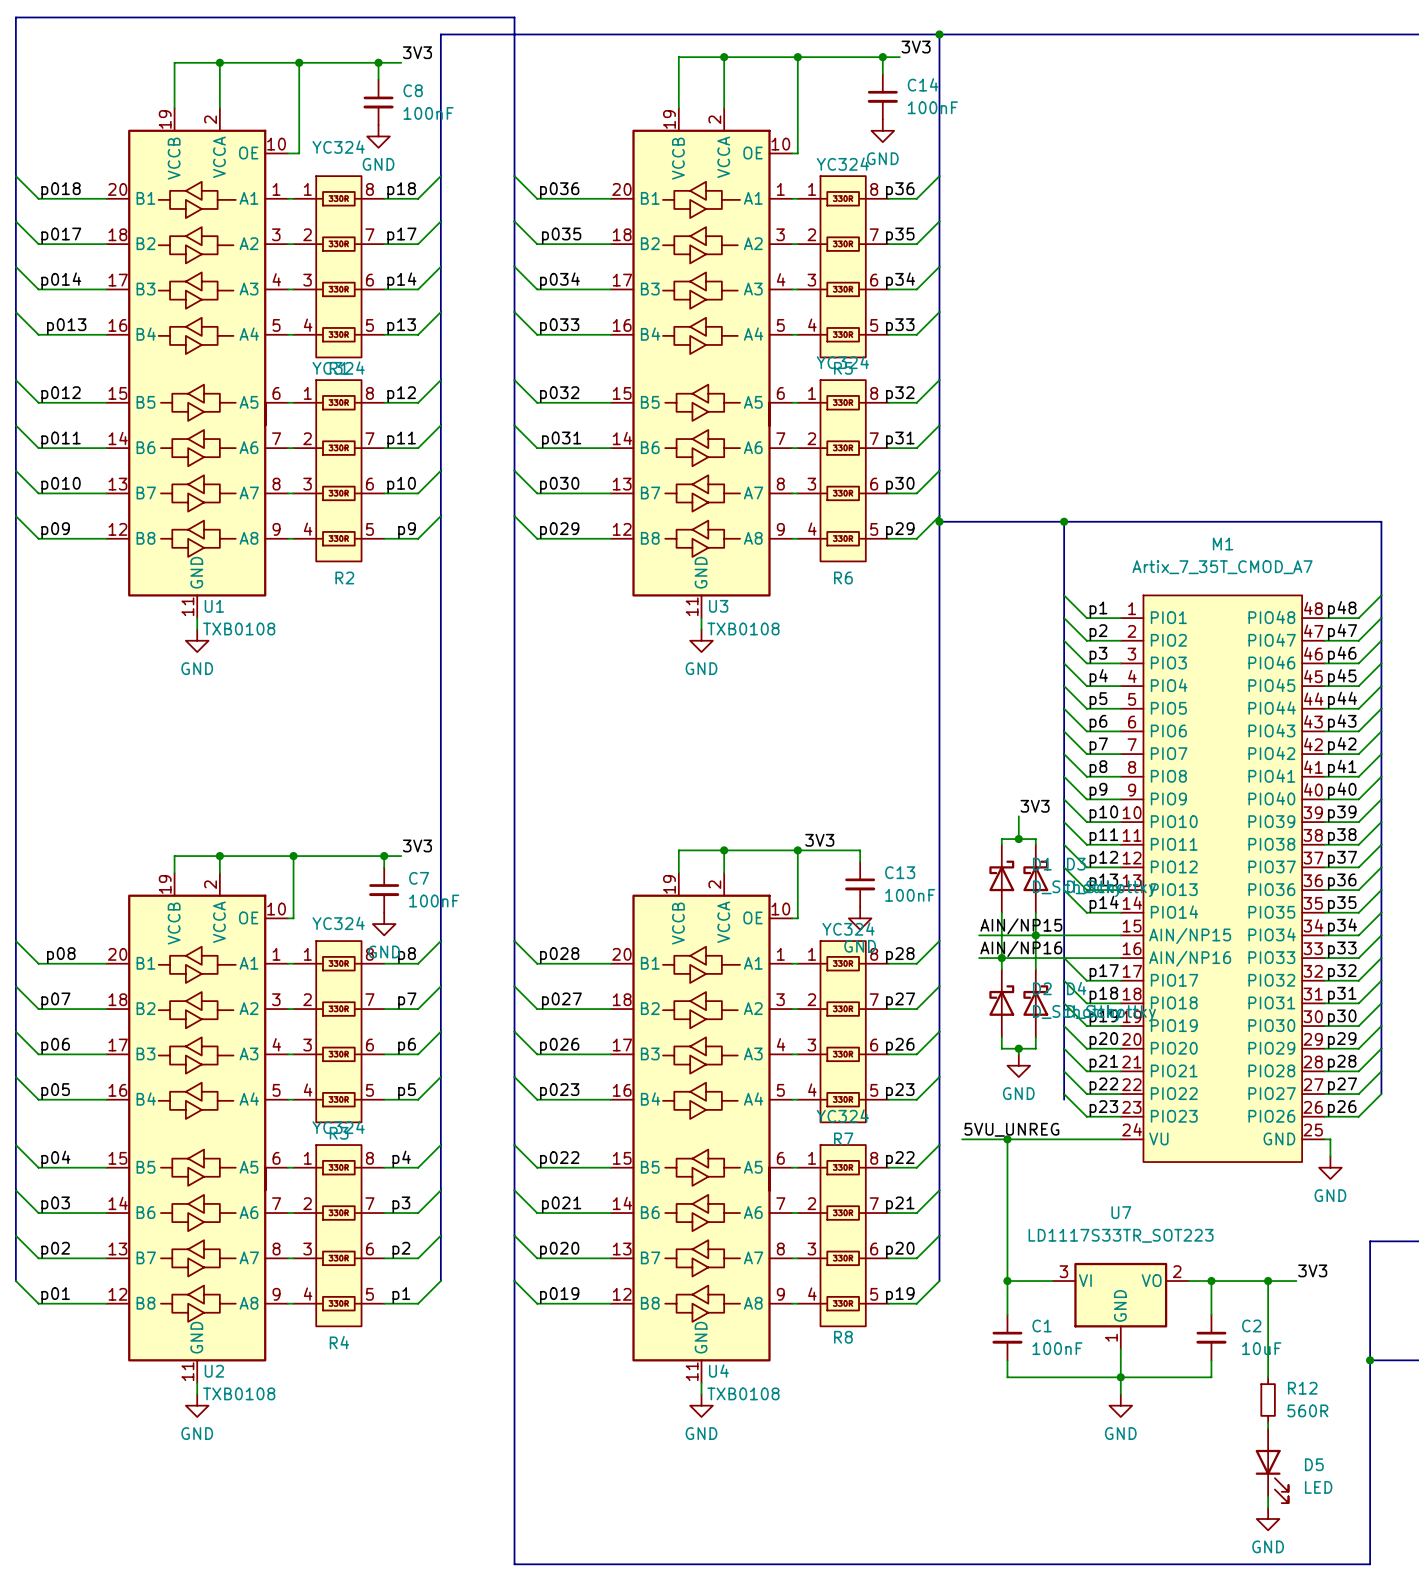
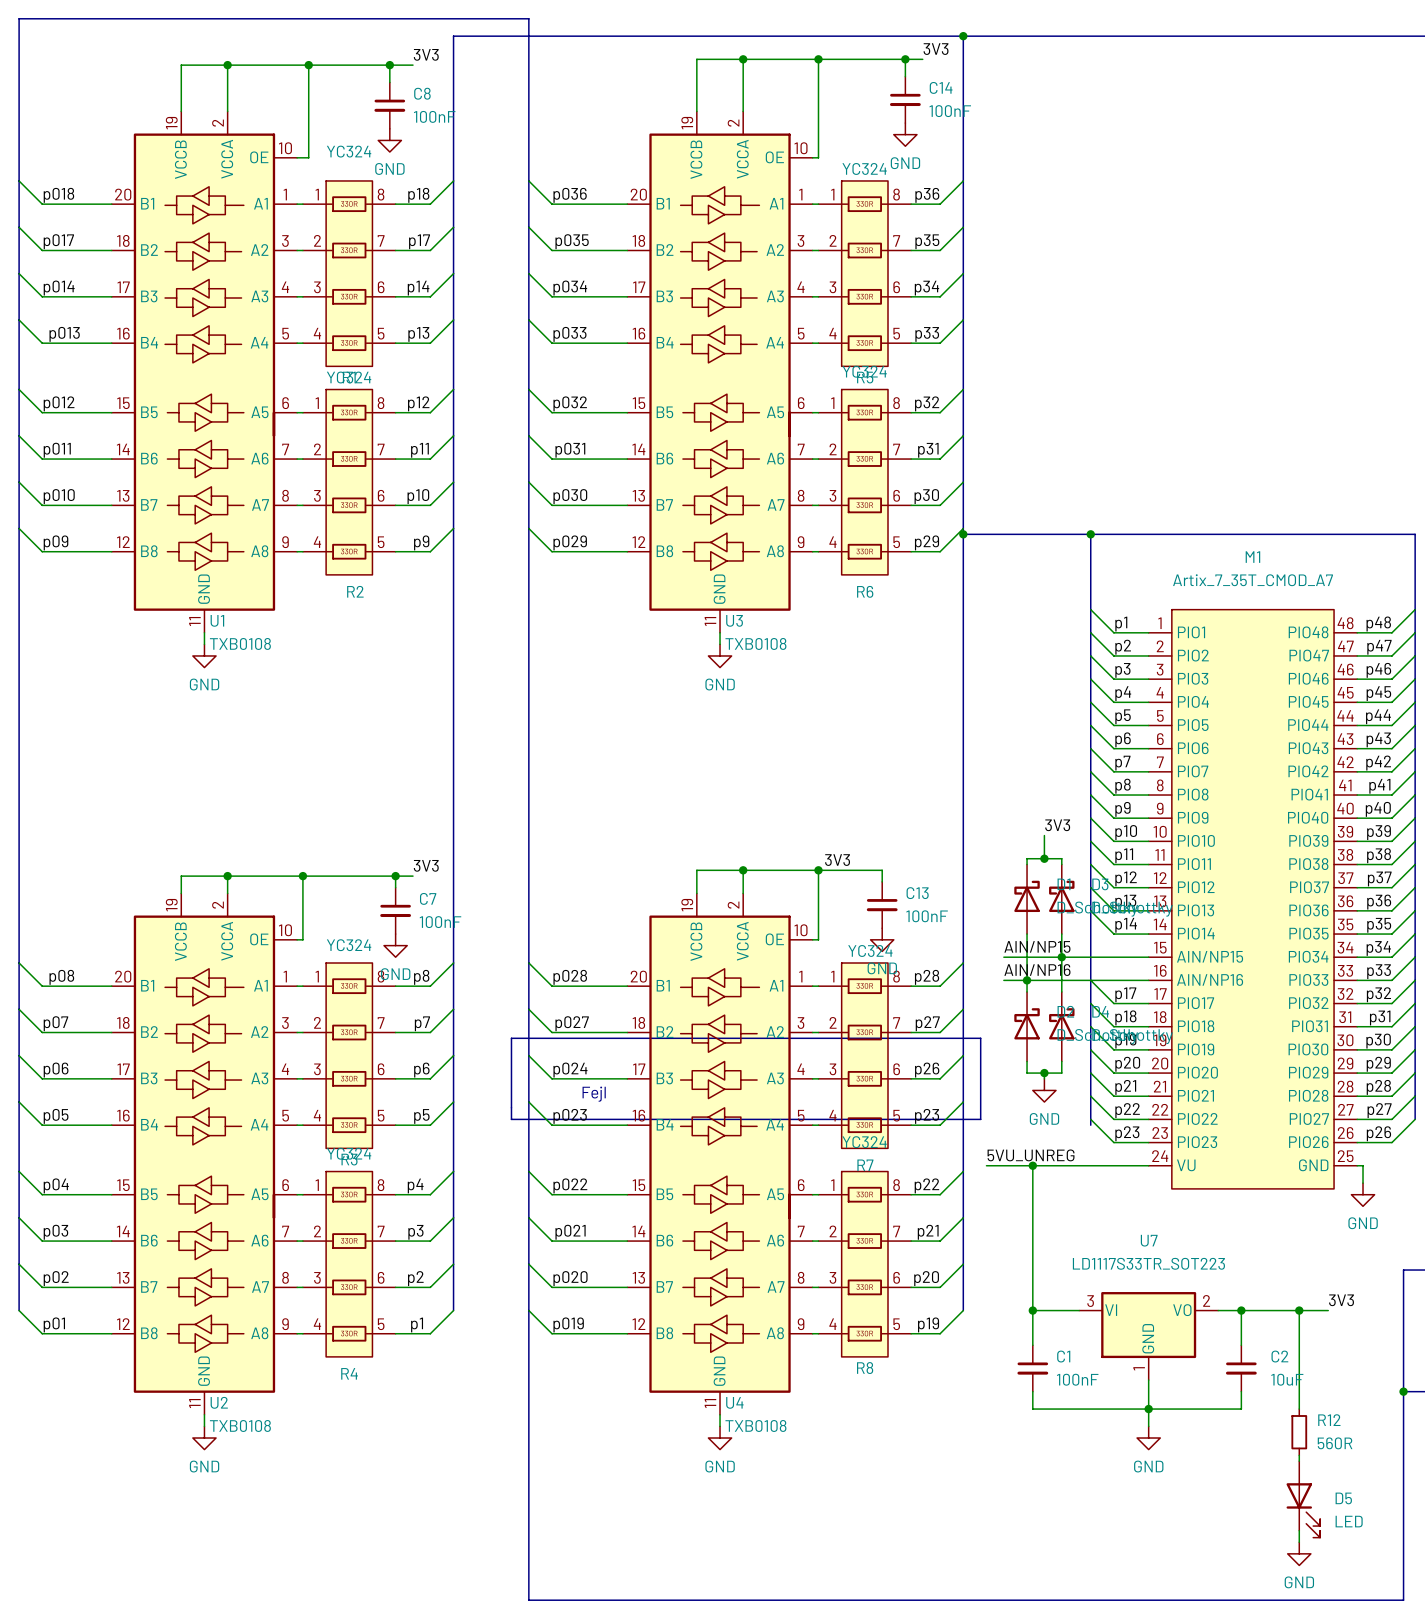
line: none -> (511, 1038) (980, 1038) (980, 1119) (511, 1119) (511, 1038)
label: p026 (559, 1046) -> p024 (570, 1070)
text: none -> Fejl (594, 1094)

